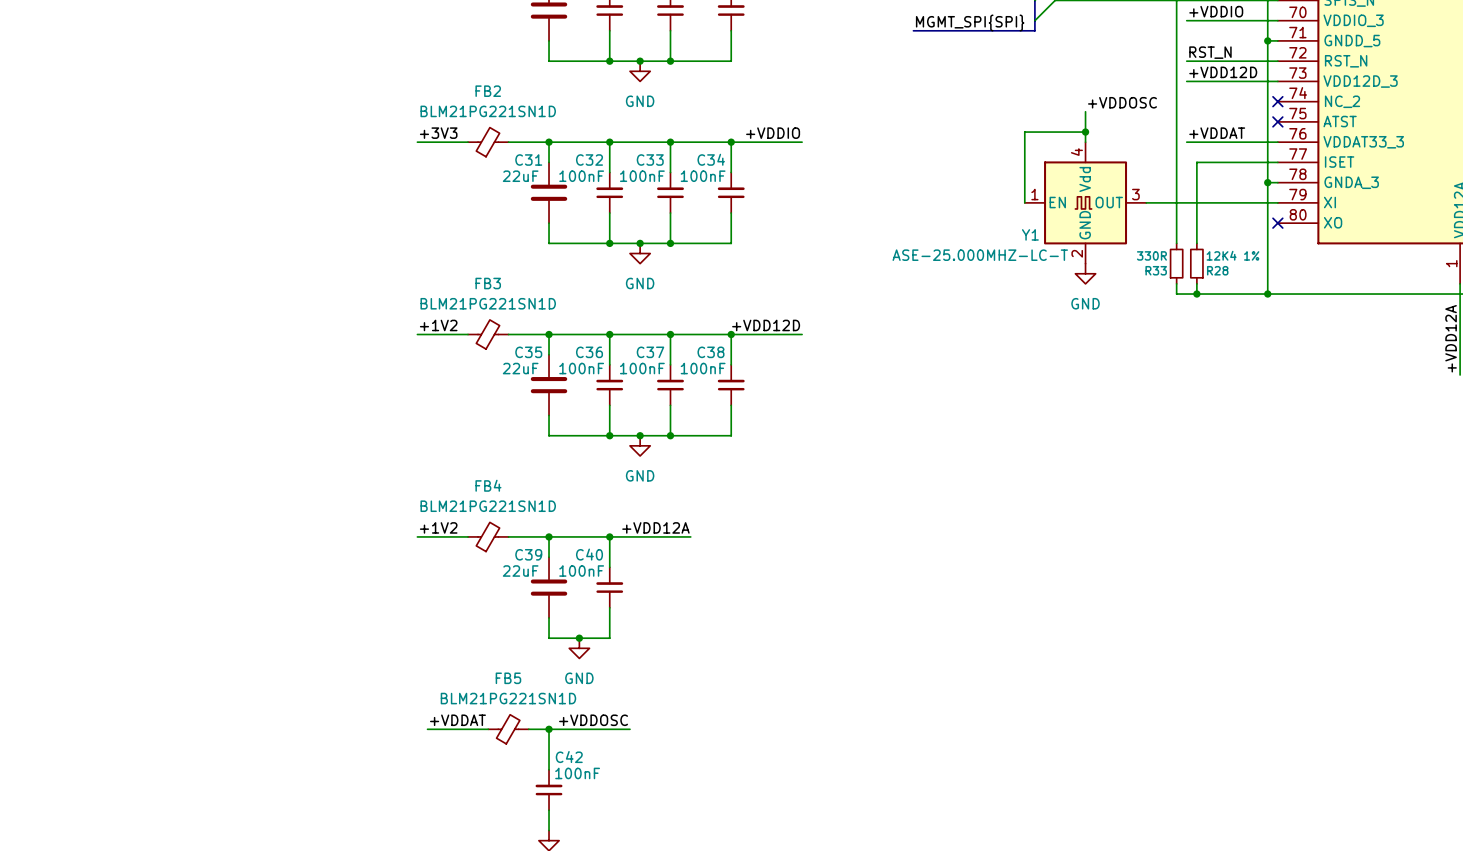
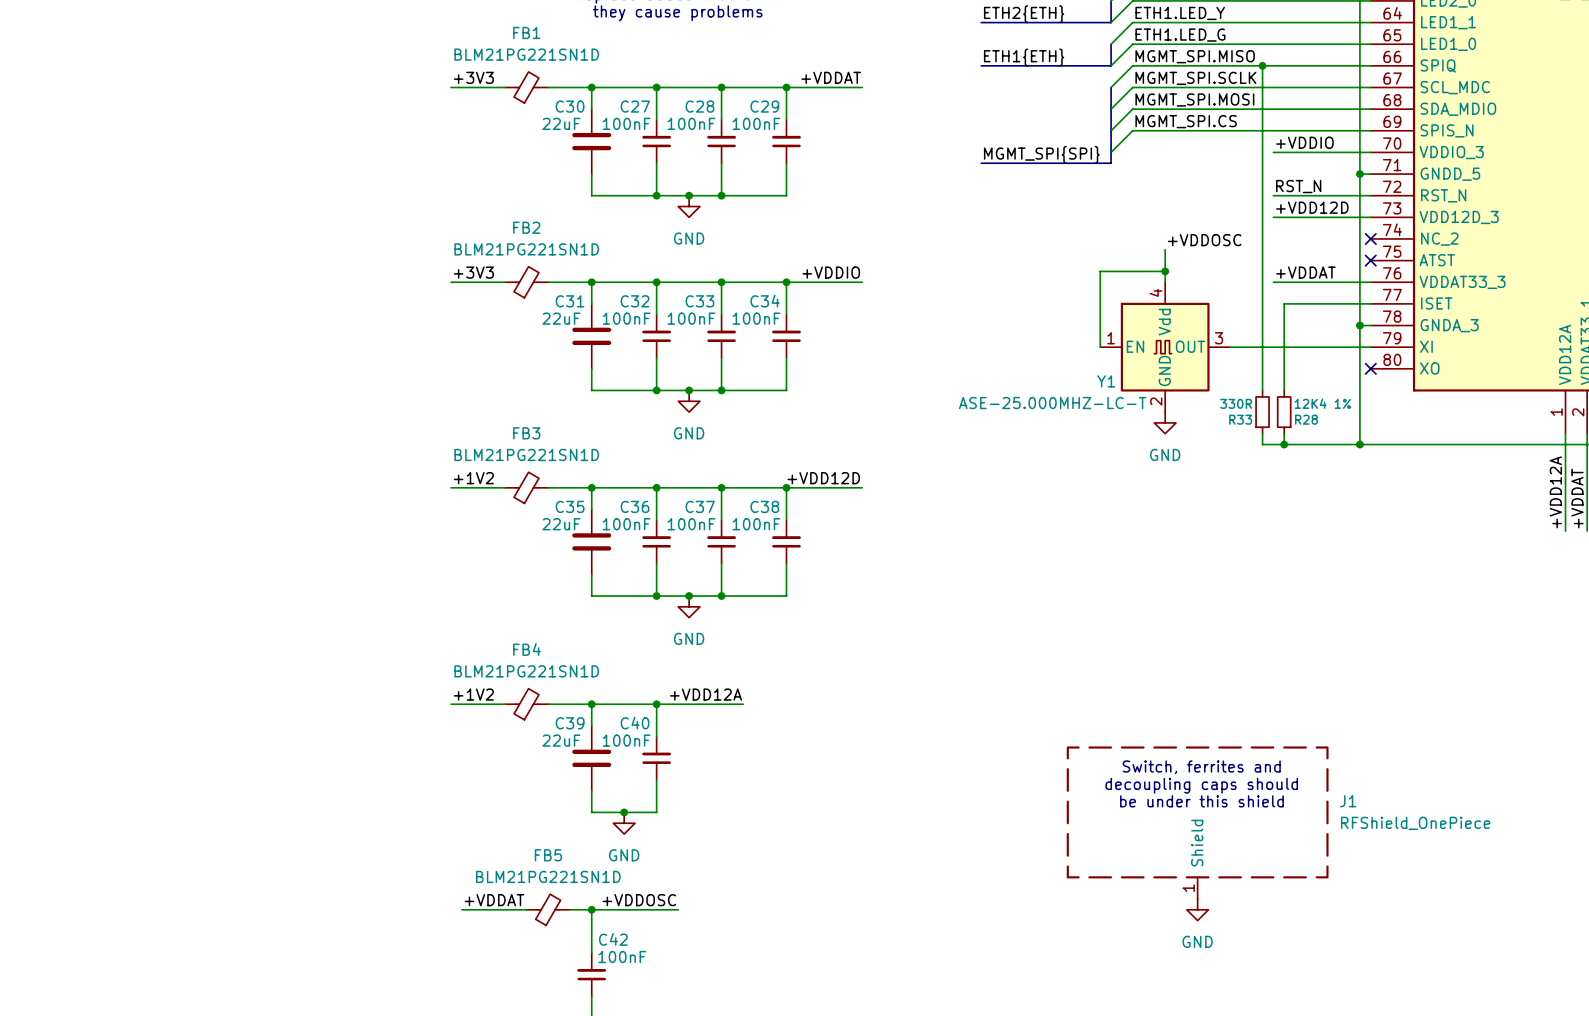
text: none -> Switch, ferrites and (1201, 767)
text: none -> decoupling caps should (1201, 785)
text: none -> be under this shield (1201, 801)
J1: none -> RFShield_OnePiece (1197, 822)
power symbol: none -> GND (1197, 909)

